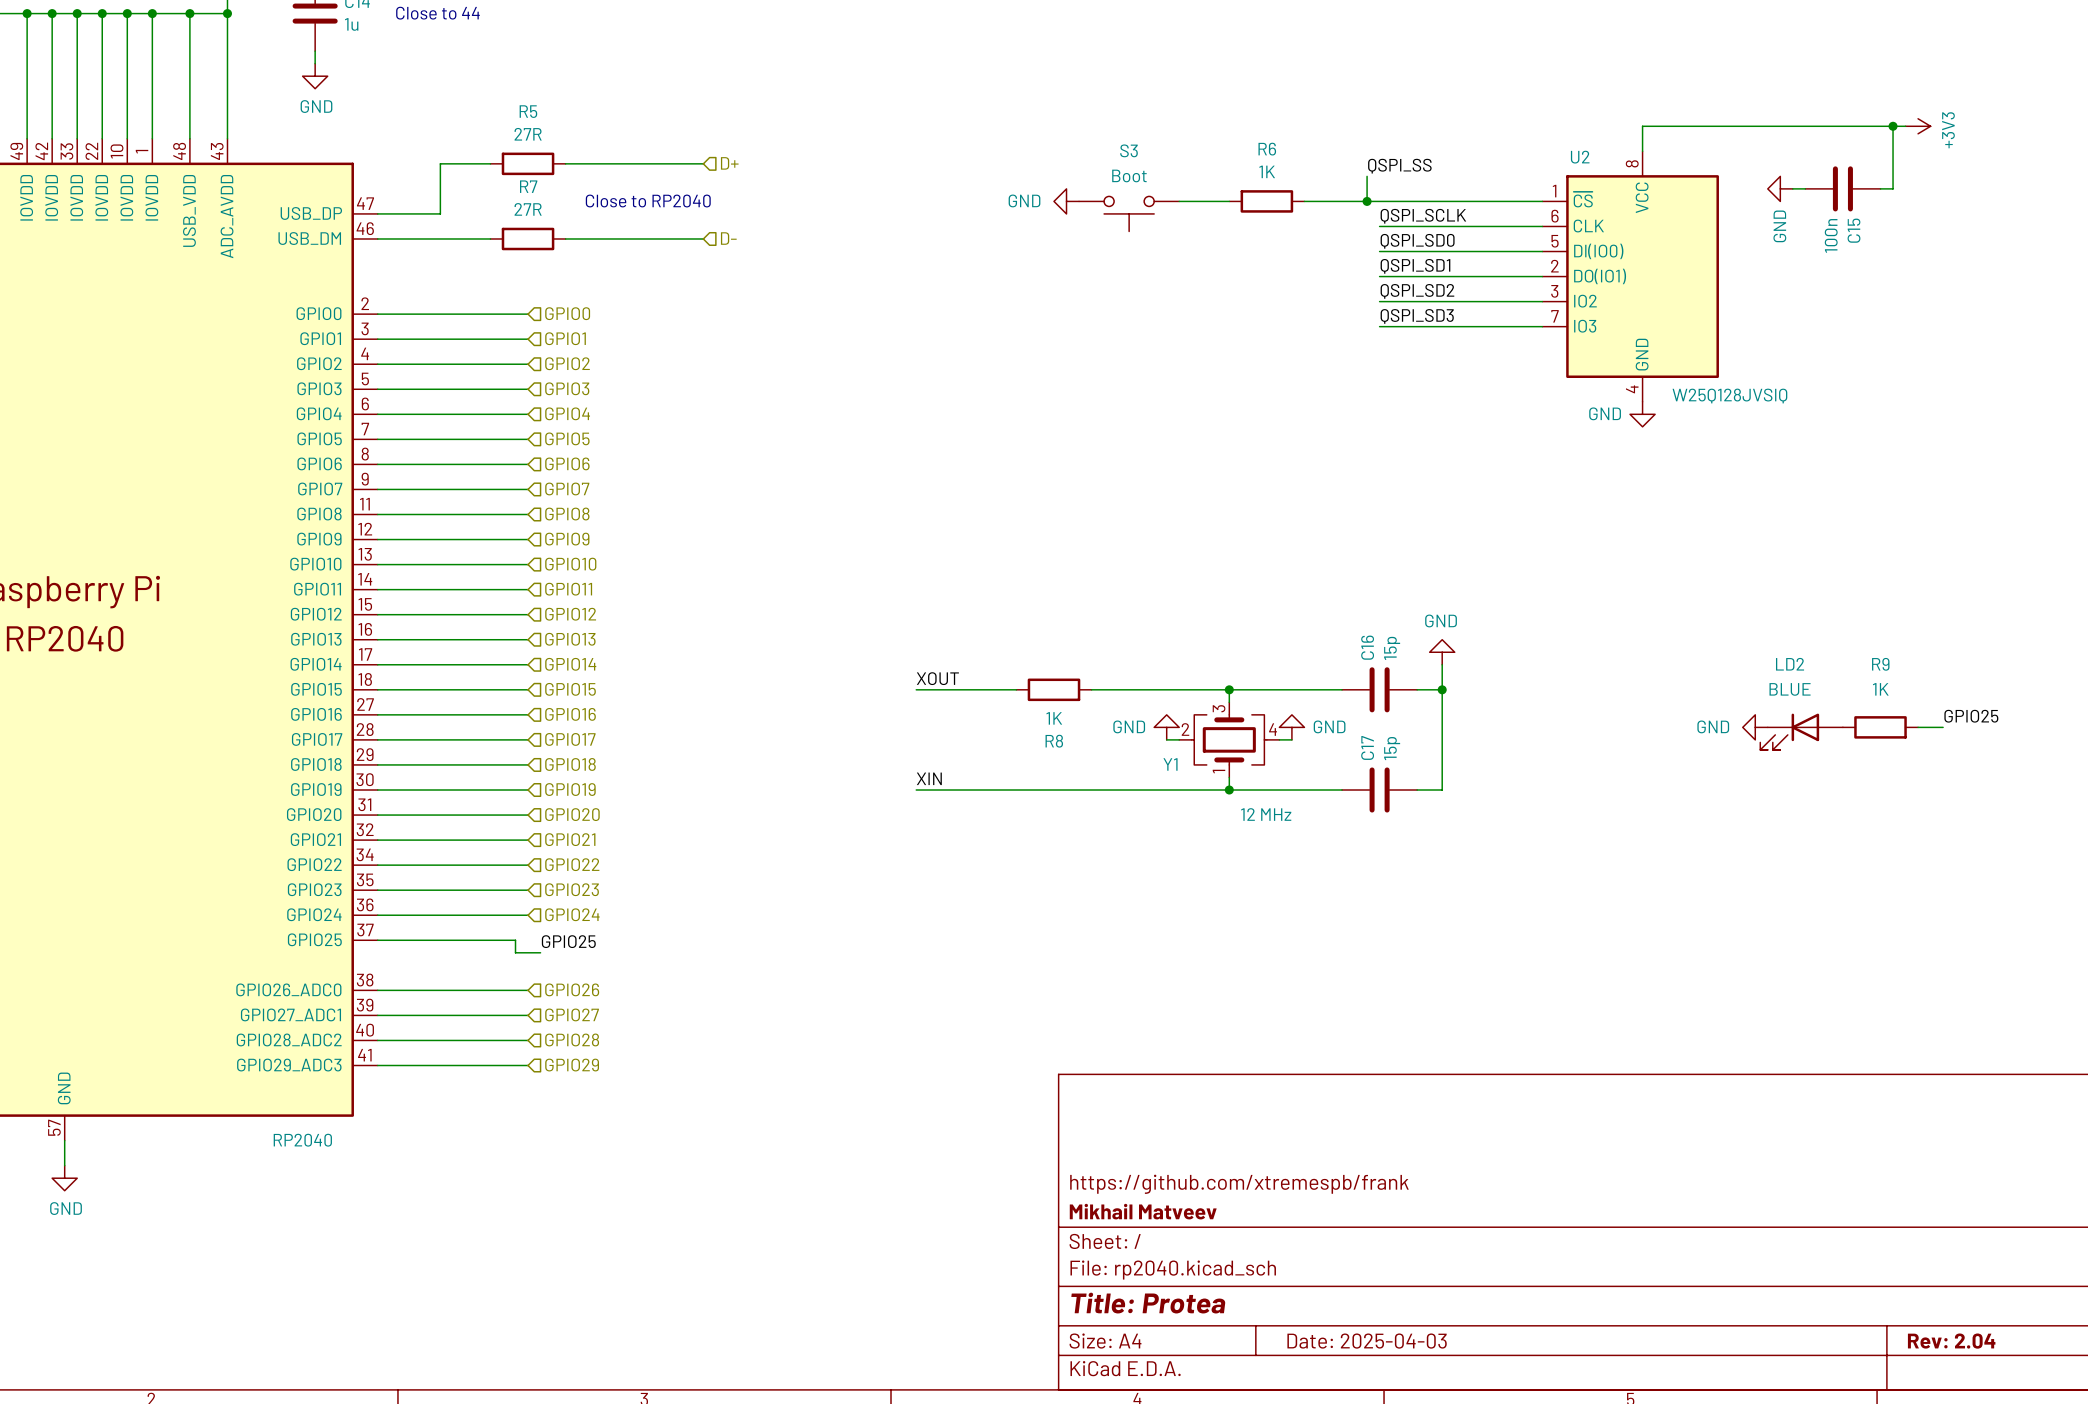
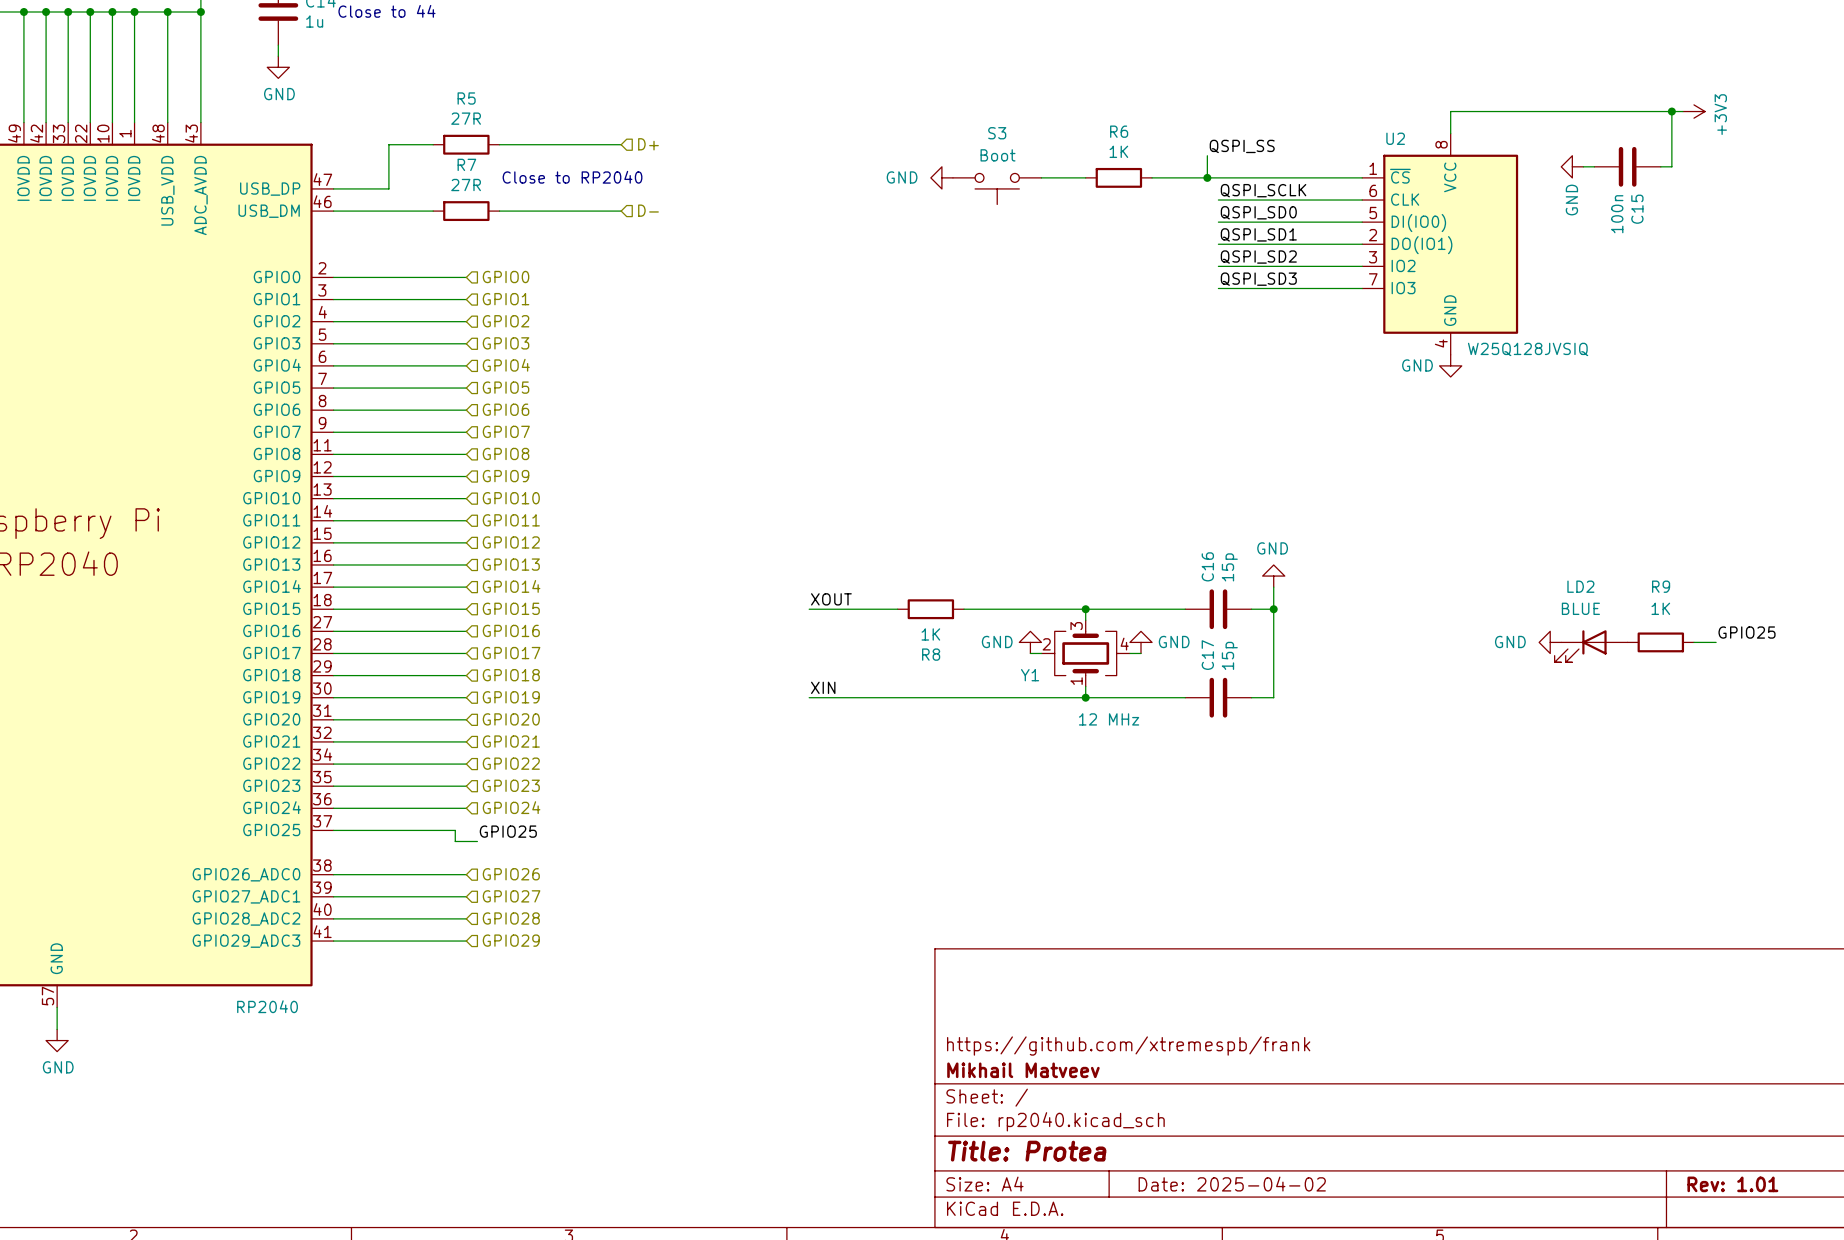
title block: Date: 2025-04-03 (1367, 1341) -> Date: 2025-04-02 (1232, 1184)
title block: Rev: 2.04 (1951, 1341) -> Rev: 1.01 (1732, 1184)

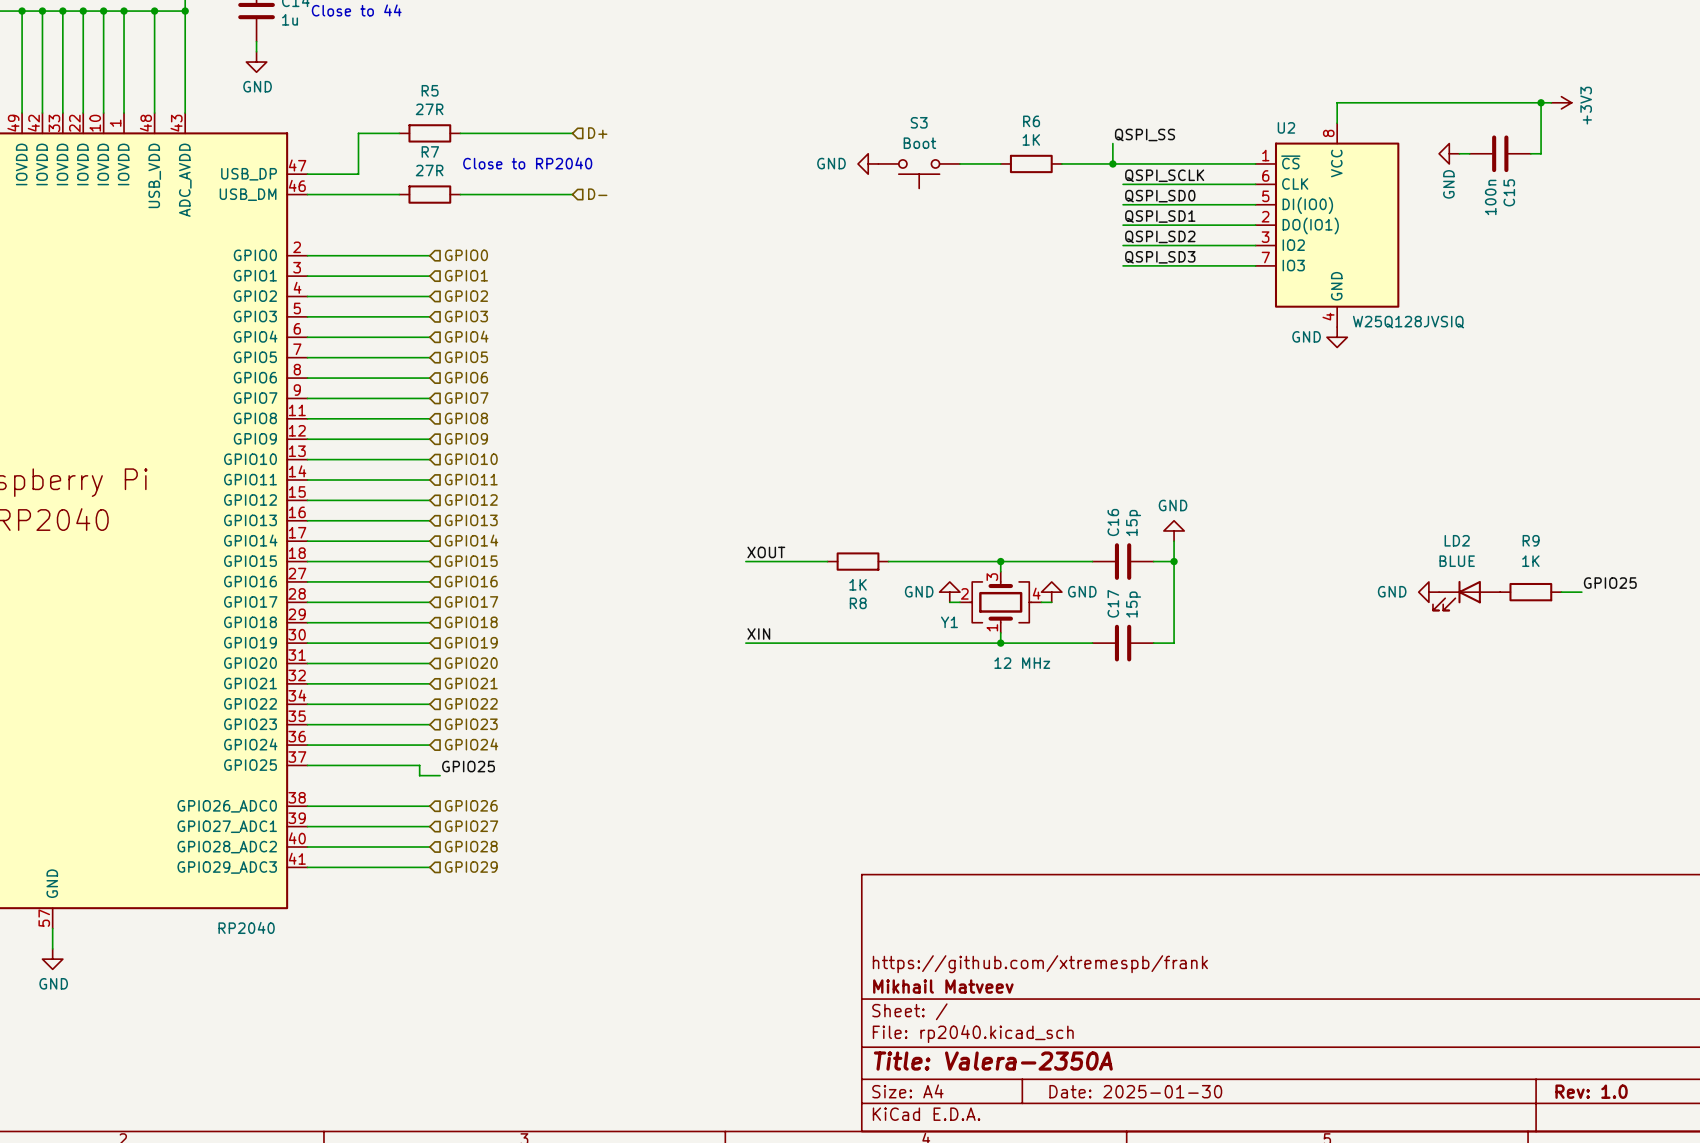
title block: Title: Protea (1027, 1151) -> Title: Valera-2350A (993, 1061)
title block: Date: 2025-04-02 (1232, 1184) -> Date: 2025-01-30 (1135, 1091)
title block: Rev: 1.01 (1732, 1184) -> Rev: 1.0 (1591, 1091)

